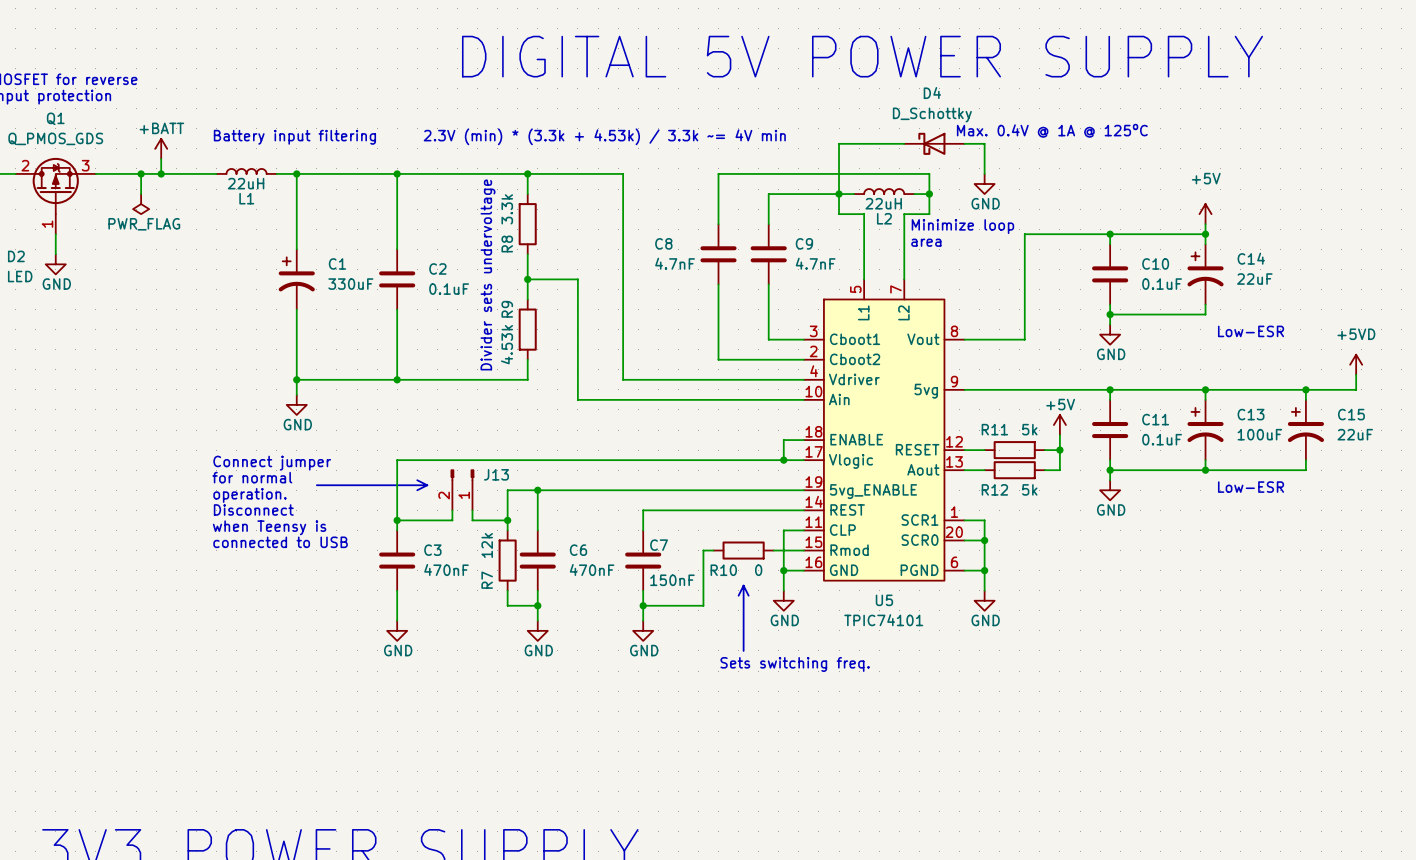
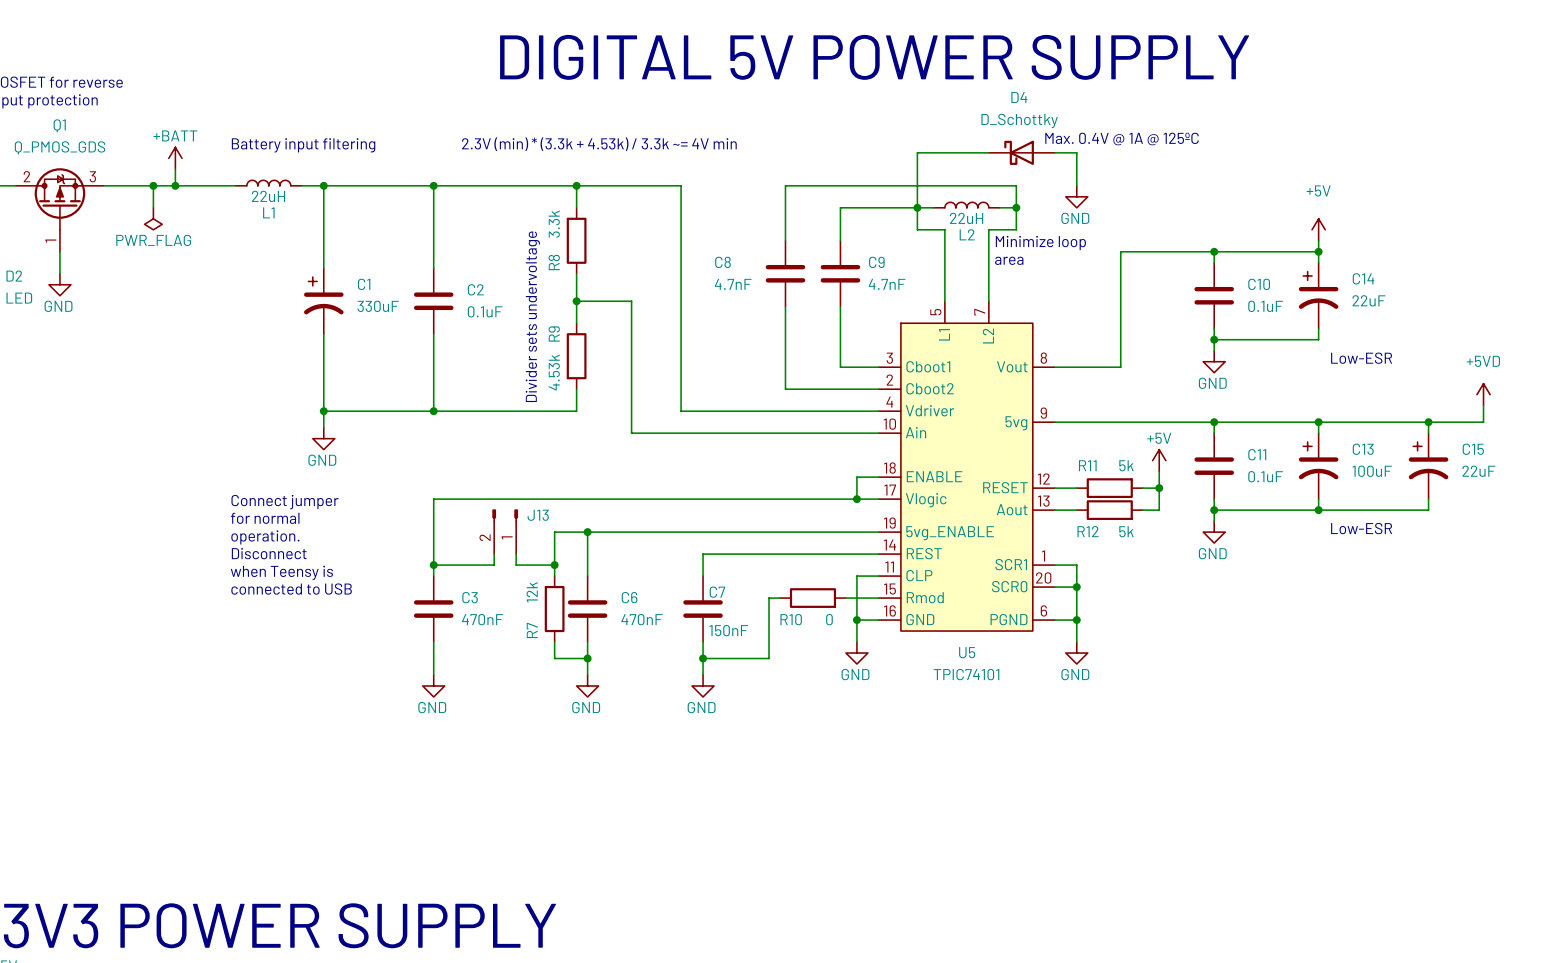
line: (417, 480) (427, 485) -> none
line: (316, 485) (427, 485) -> none
line: (427, 485) (417, 490) -> none
line: (743, 585) (748, 595) -> none
line: (743, 585) (743, 650) -> none
line: (743, 585) (738, 595) -> none
text: Sets switching freq. (795, 664) -> none

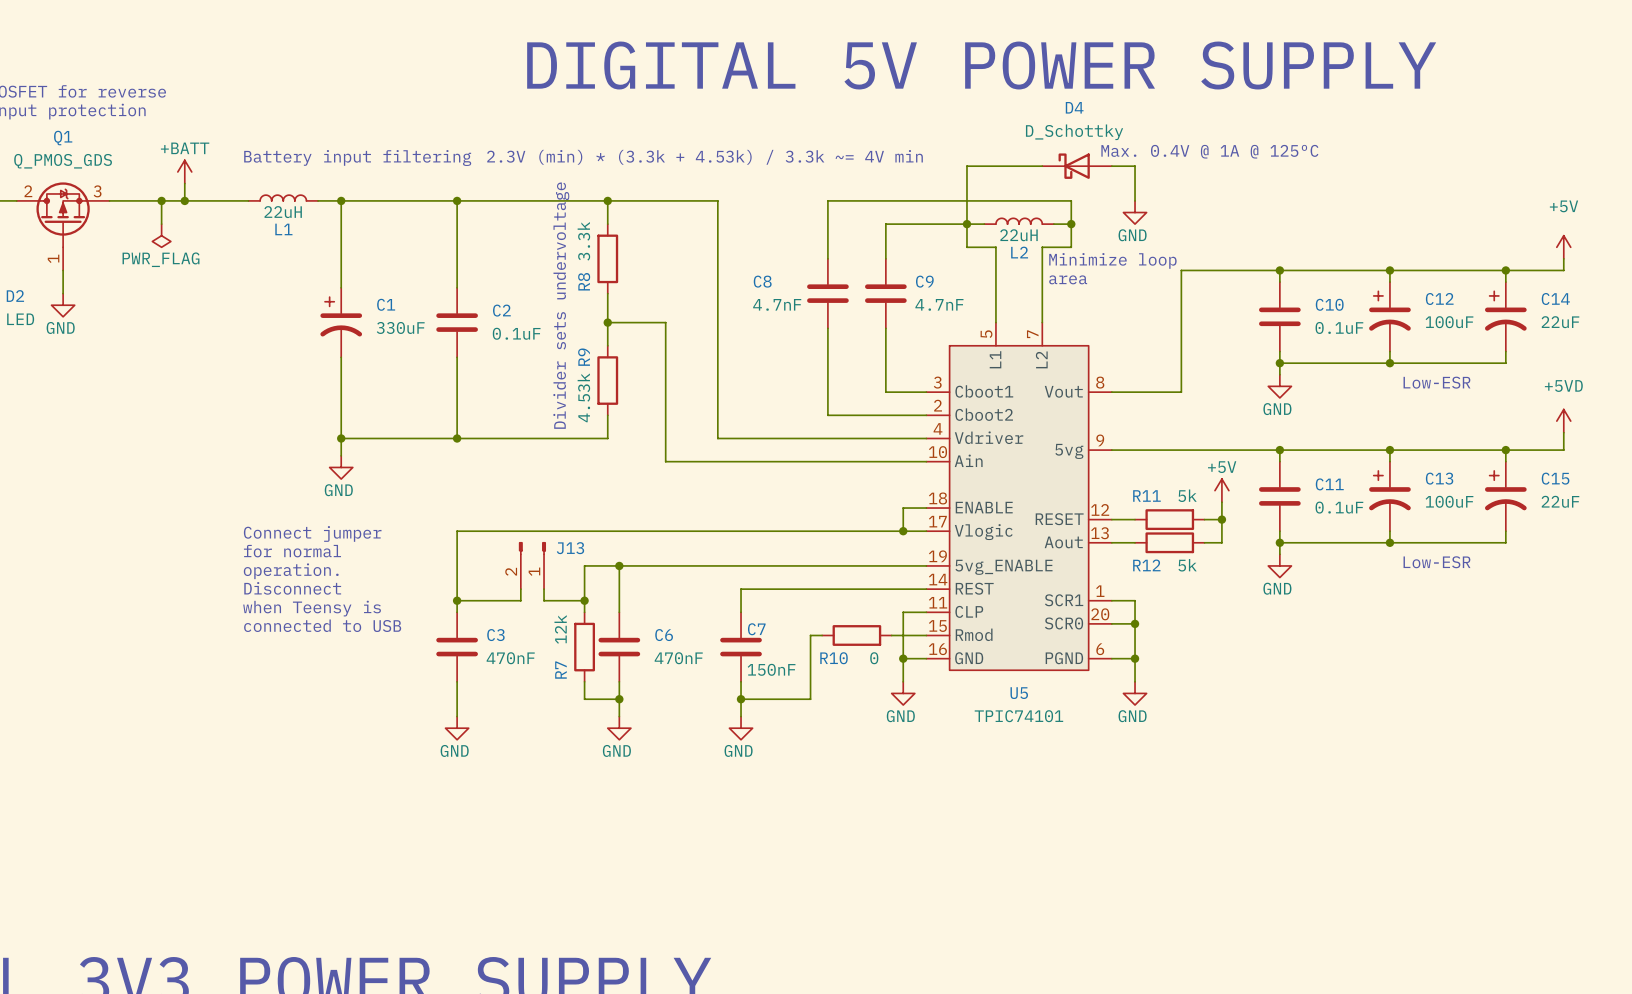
power symbol position: +5V (1318, 229) -> +5V (1563, 247)
wire: (1318, 240) (1318, 251) -> (1563, 258) (1563, 270) (1389, 270)
wire: none -> (1505, 270) (1505, 282)
junction: none -> (1505, 270)
C14 name: C14 (1363, 278) -> C12 (1439, 299)
C14: none -> 22uF (1505, 316)
C14 value: 22uF (1368, 300) -> 100uF (1449, 322)
wire: none -> (1505, 351) (1505, 363) (1389, 363)
junction: none -> (1389, 363)

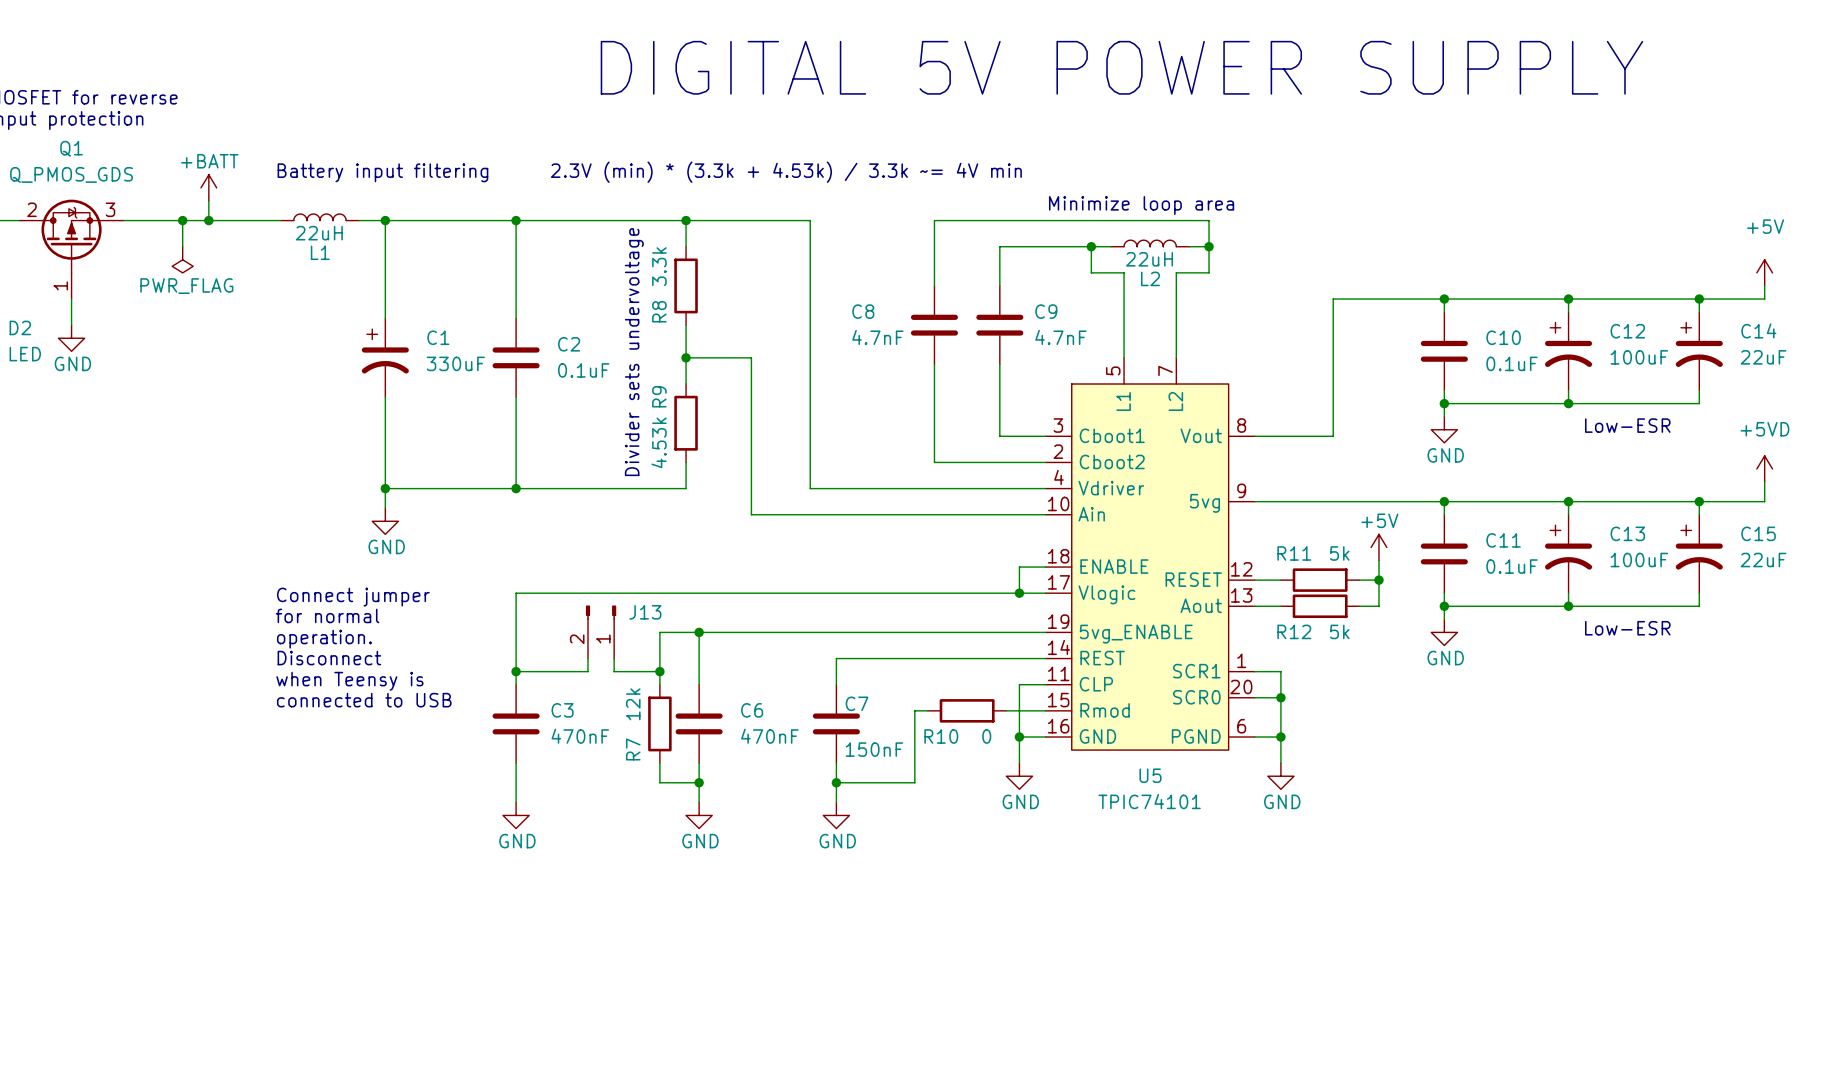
text: Max. 0.4V @ 1A @ 125ºC (1209, 151) -> none
wire: (1042, 166) (966, 166) (966, 224) -> none
D4: D_Schottky (1077, 166) -> none
wire: (1111, 166) (1135, 166) (1135, 200) -> none
text: none -> Minimize loop area (1141, 205)
power symbol: GND (1135, 212) -> none
text: Minimize loop (1112, 260) -> none
text: area (1068, 279) -> none

